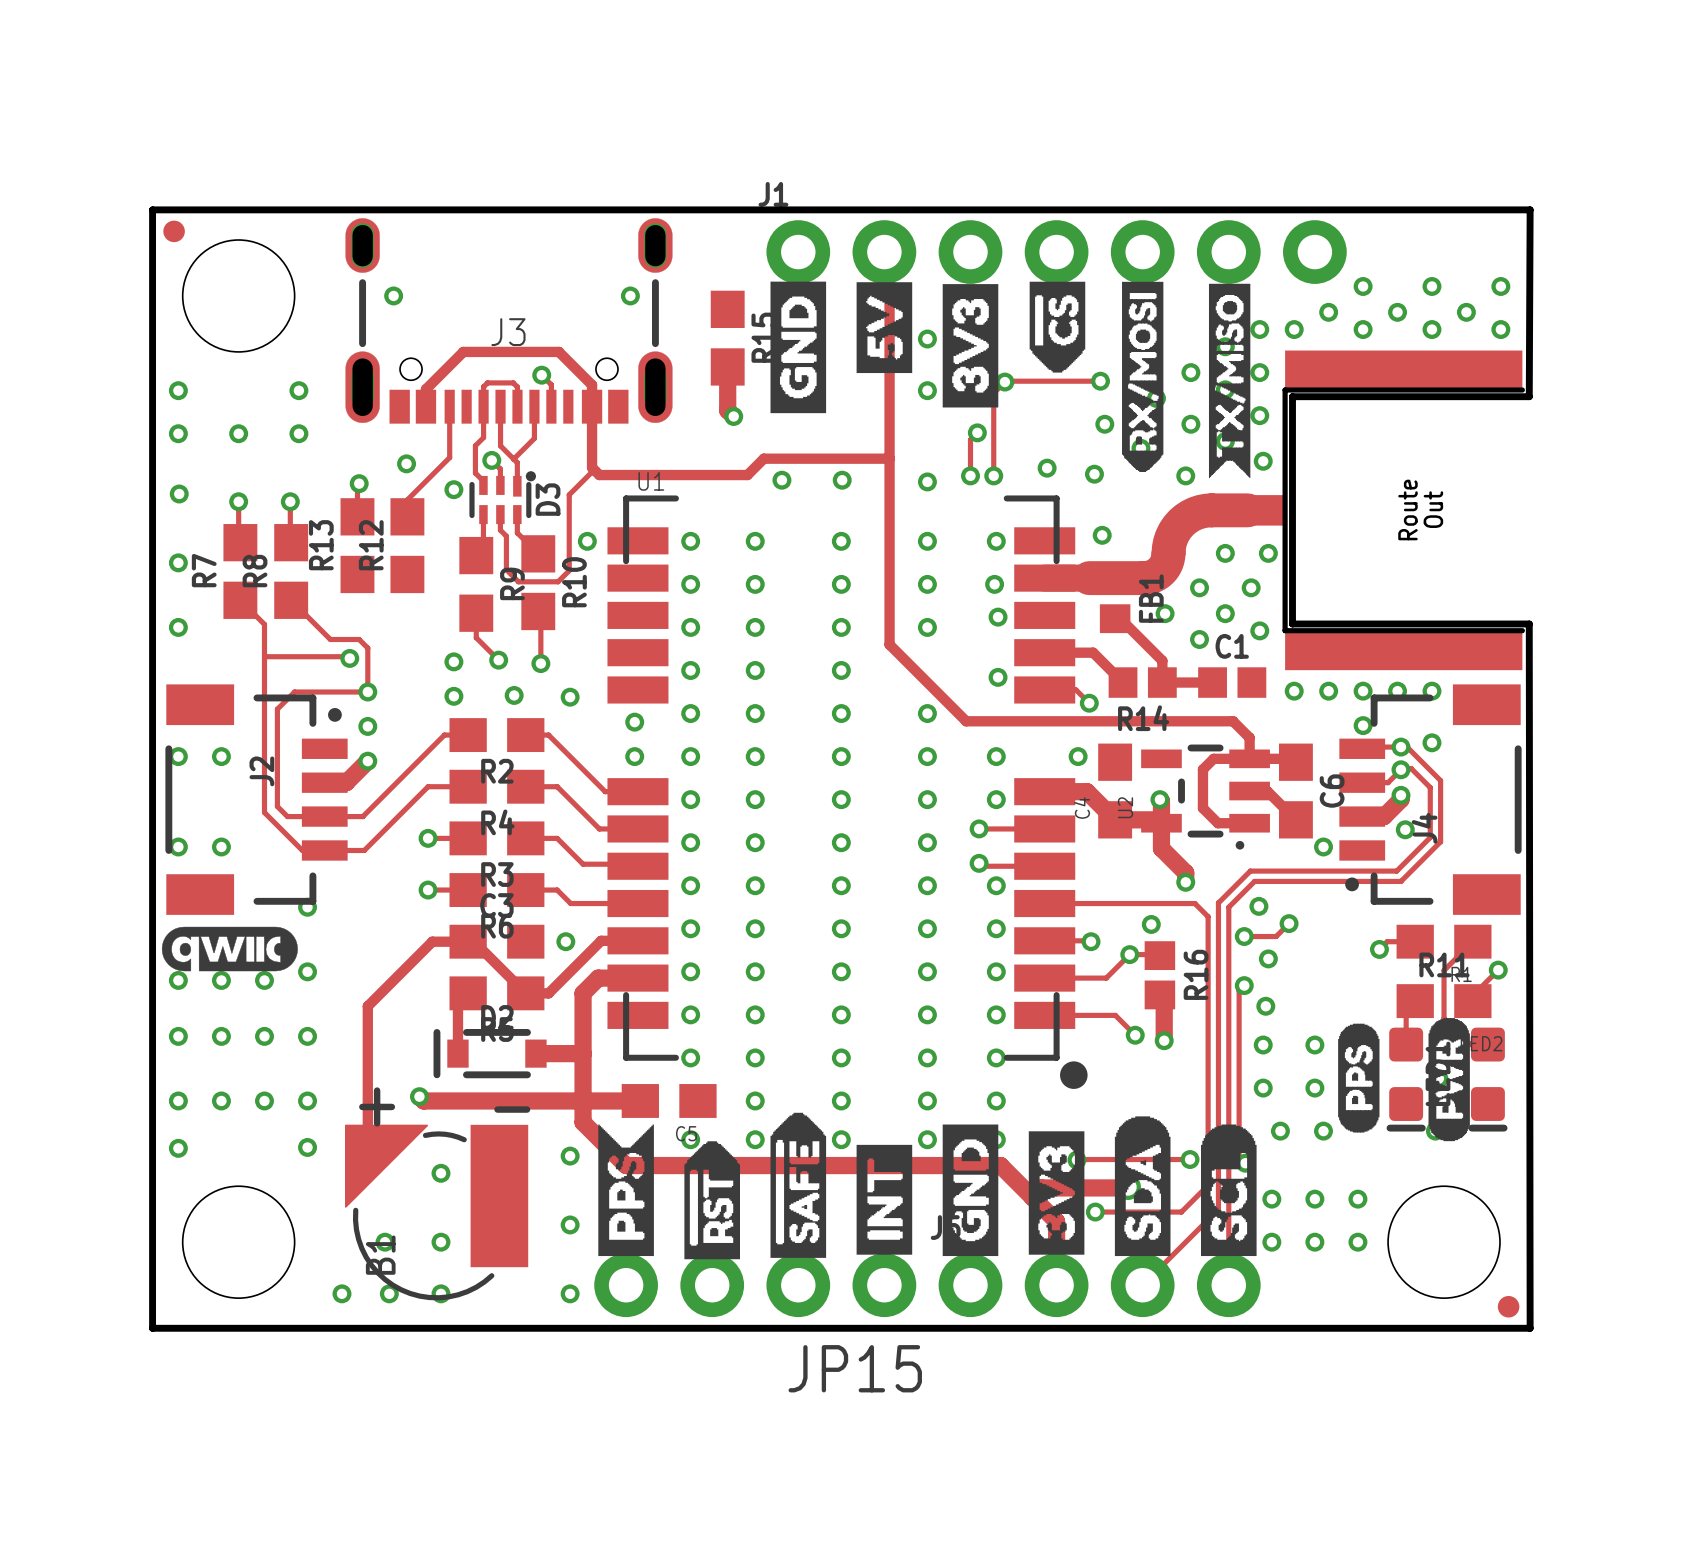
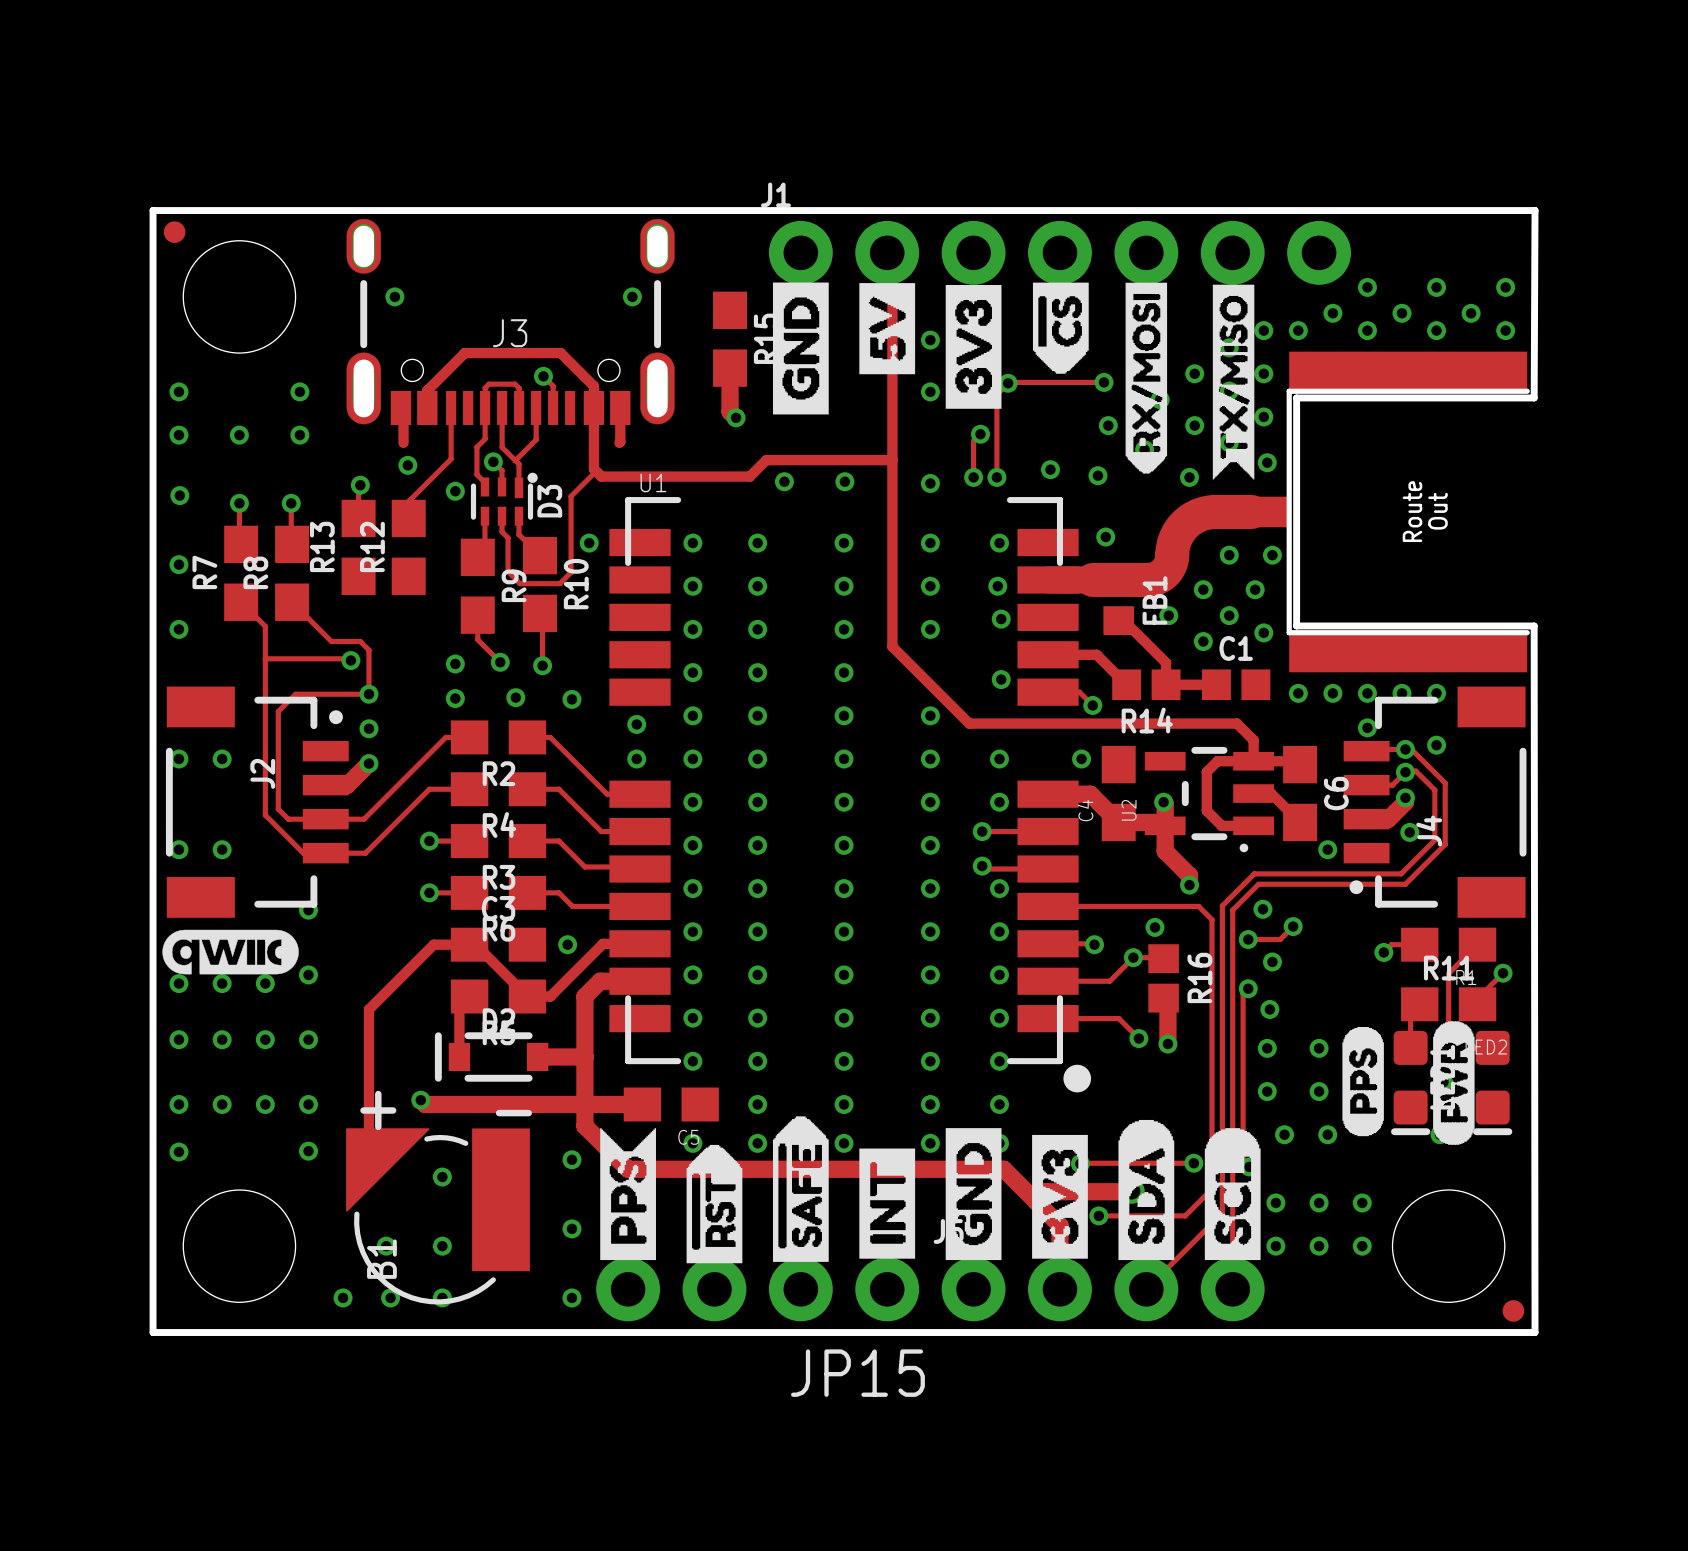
track: none -> (400, 408) (403, 410) (403, 442)
track: none -> (620, 408) (619, 442)

